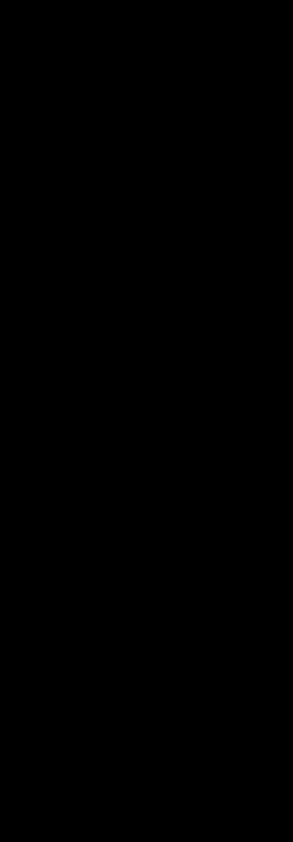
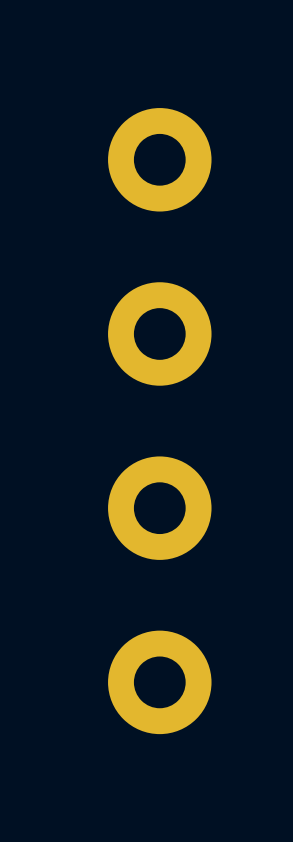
part: none -> (159, 159)
part: none -> (159, 333)
part: none -> (159, 508)
part: none -> (159, 682)

